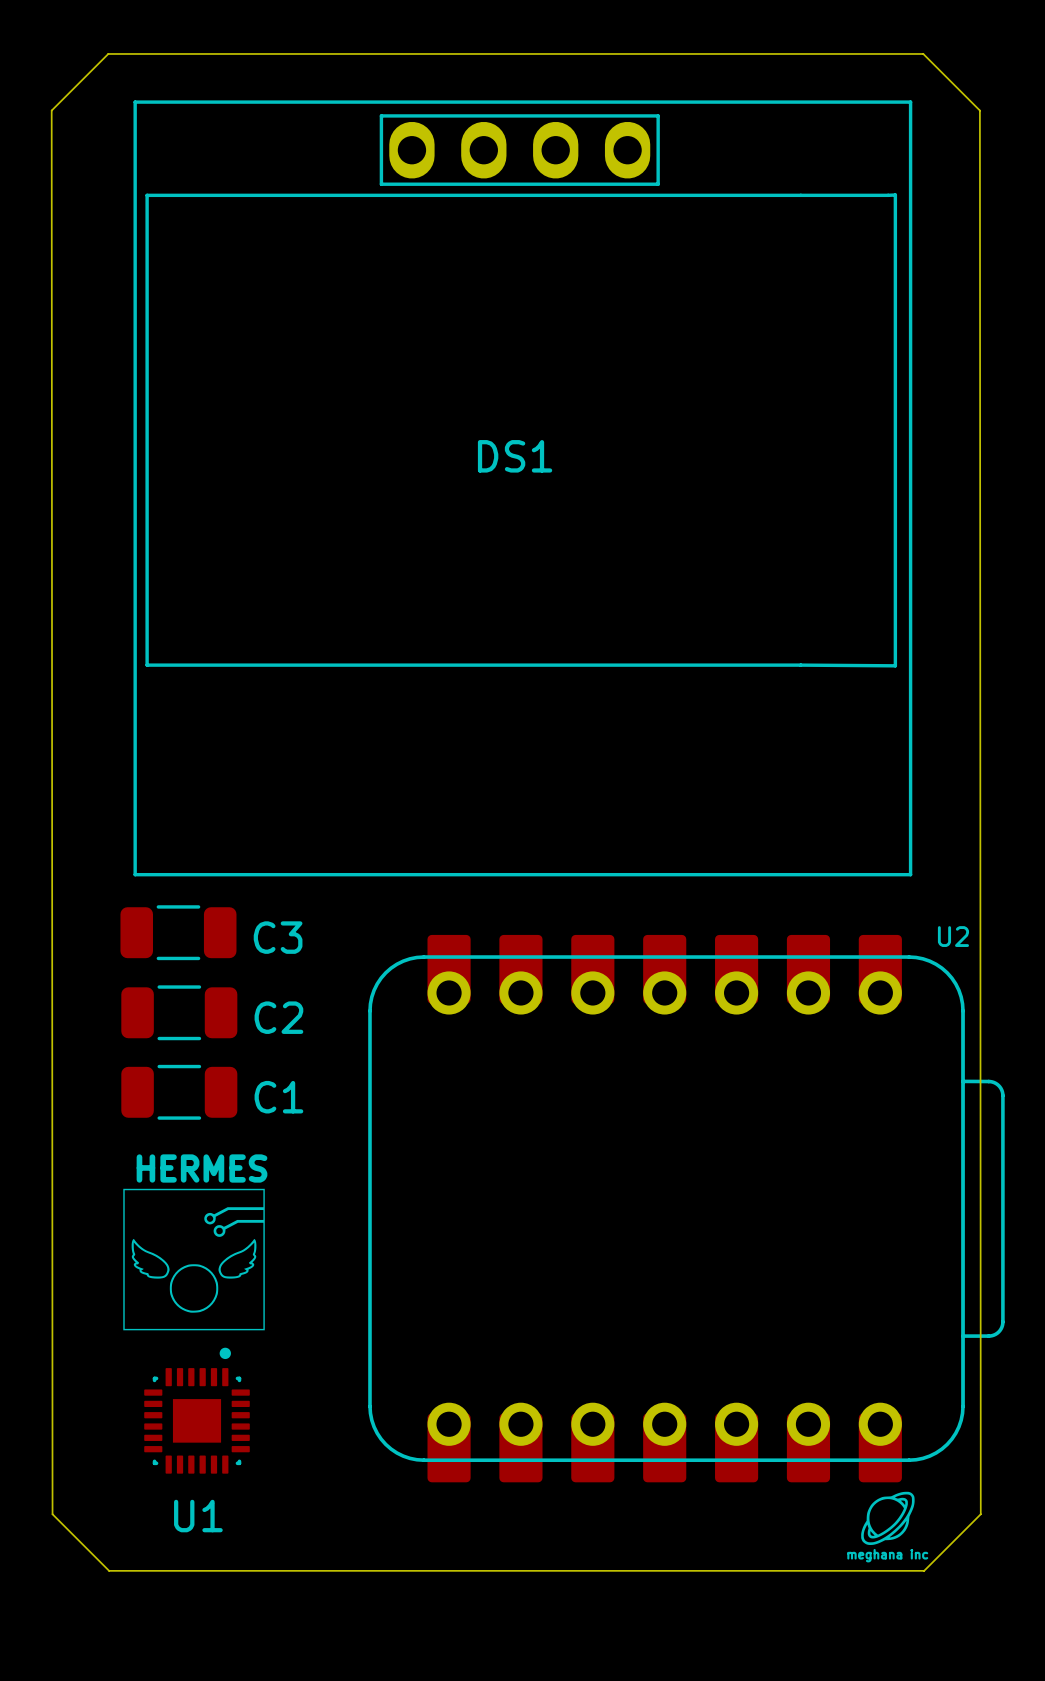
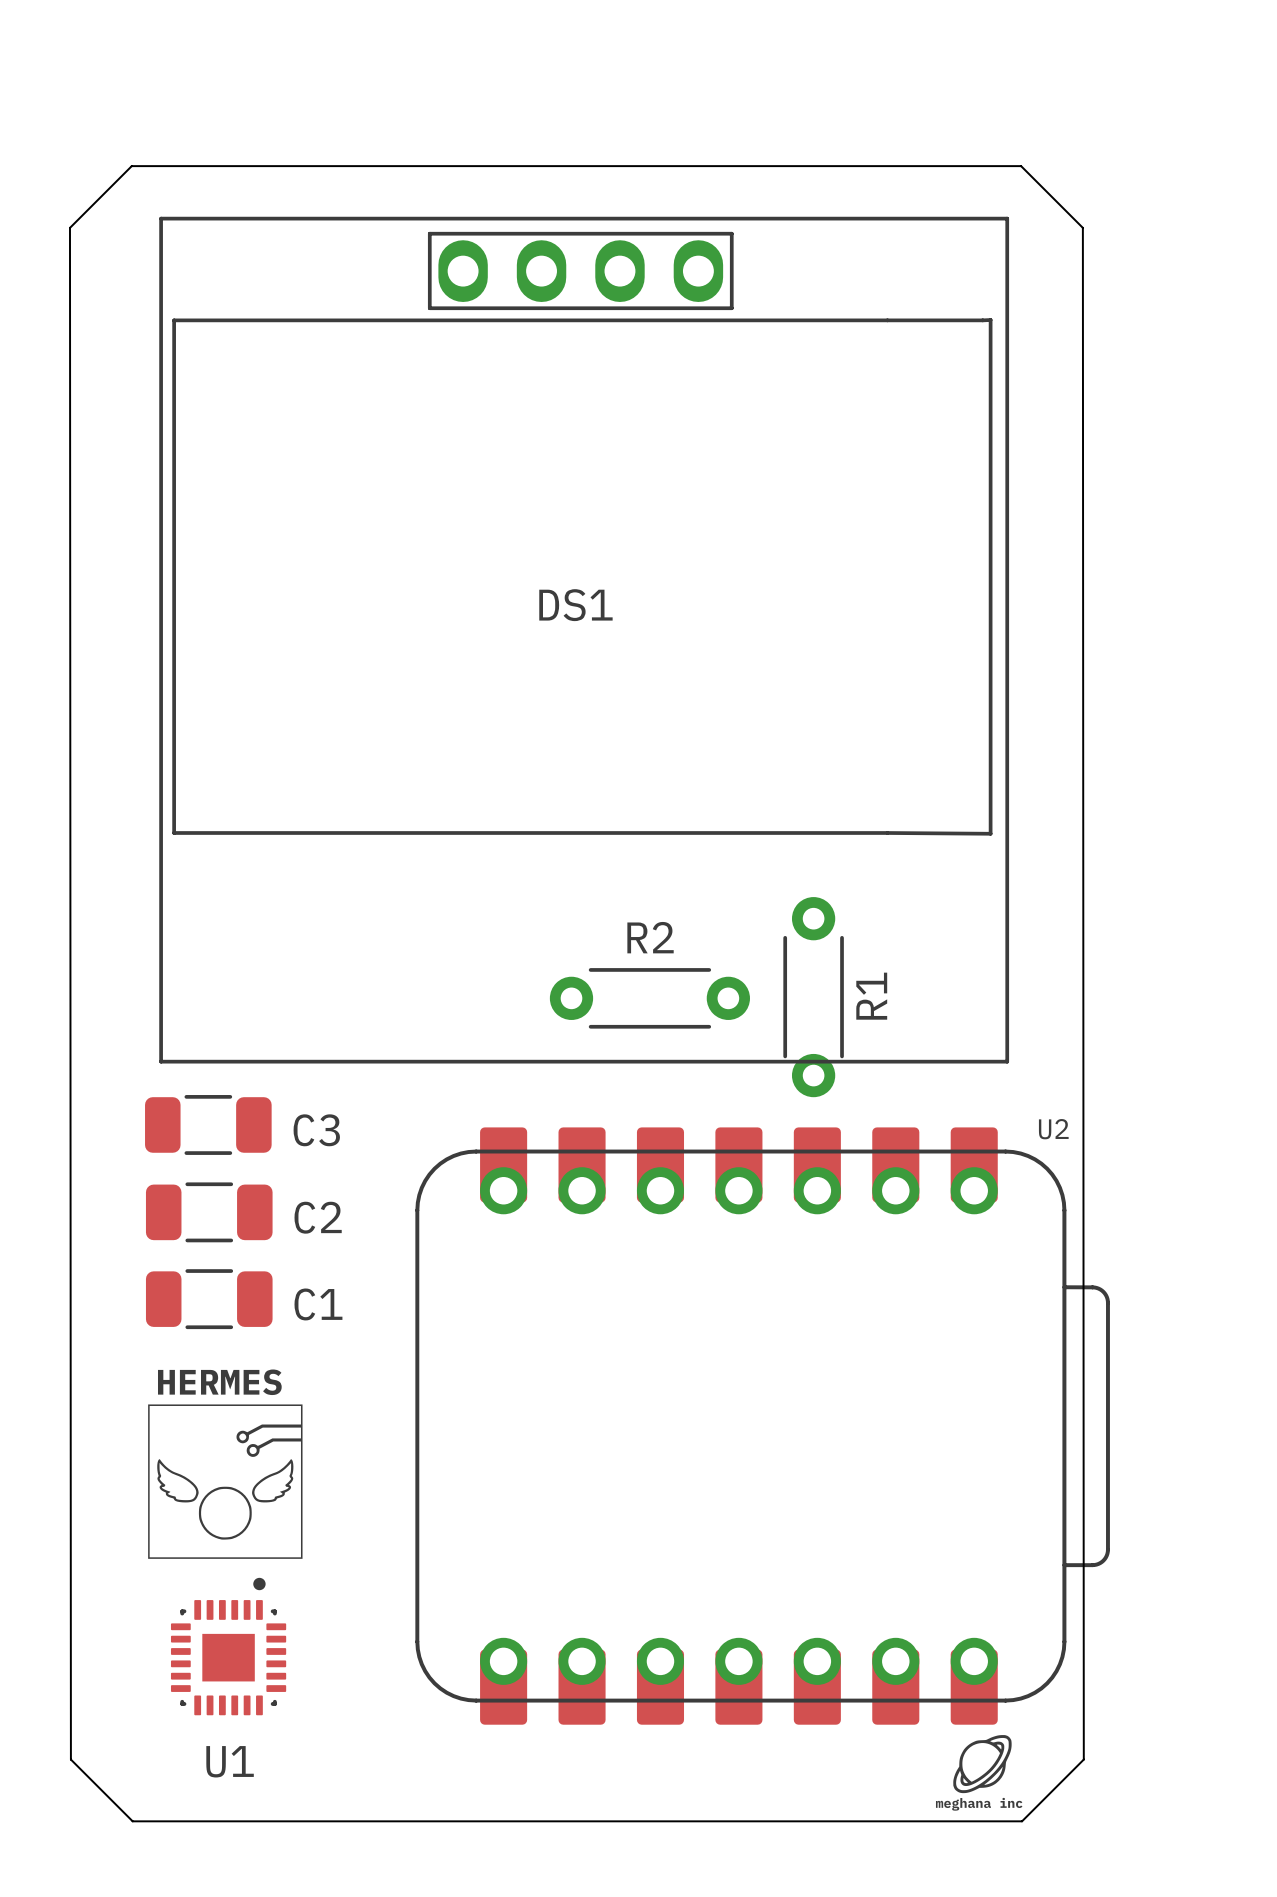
R1: none -> (813, 997)
R2: none -> (649, 998)

